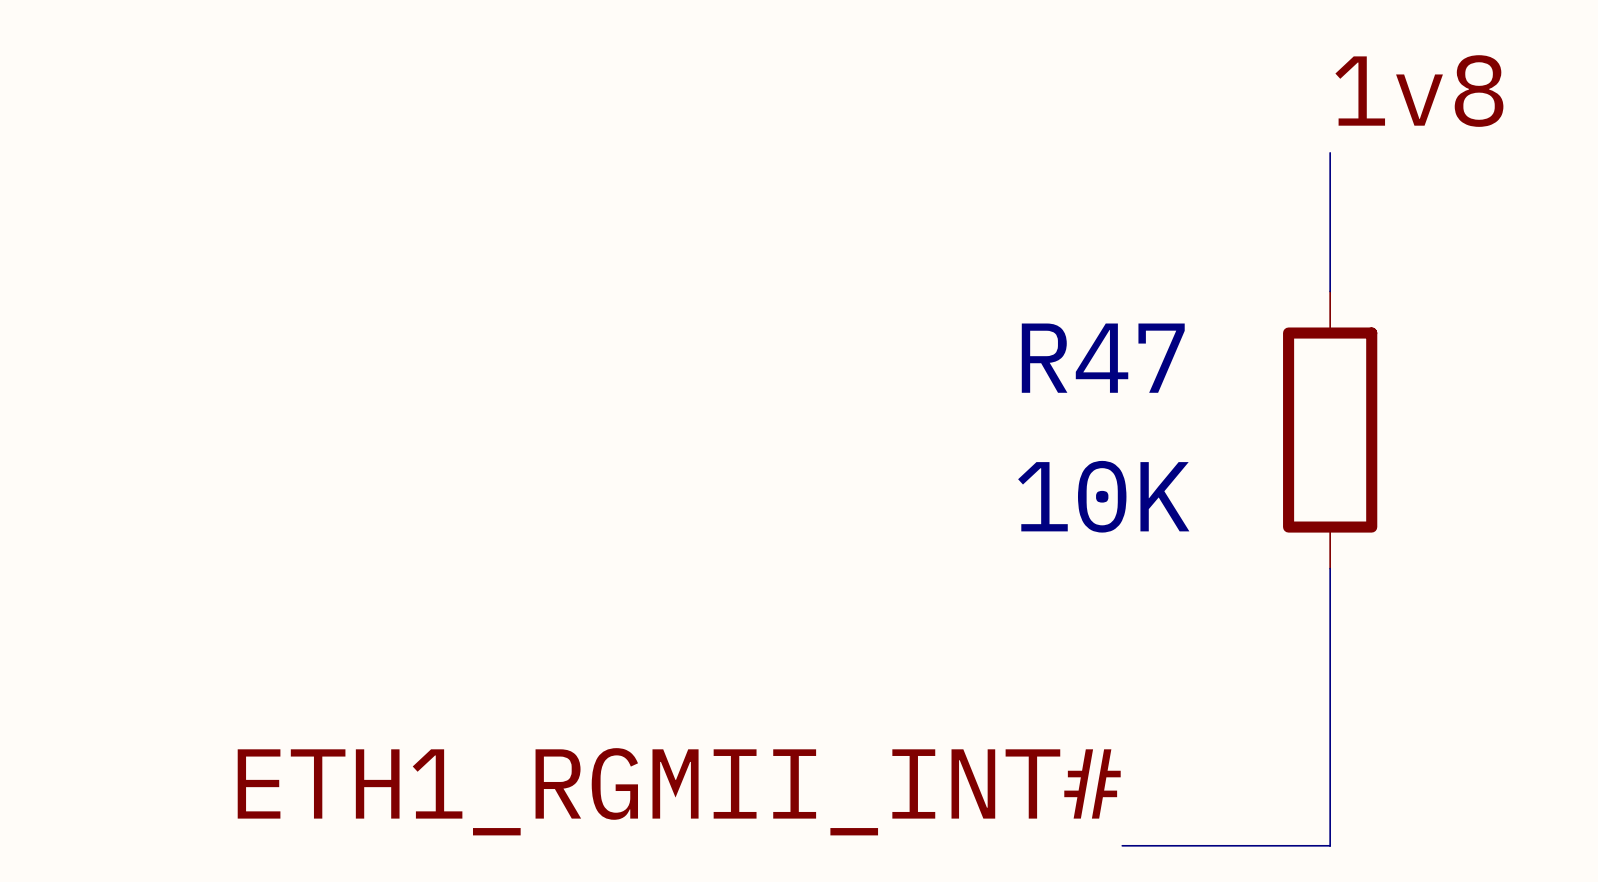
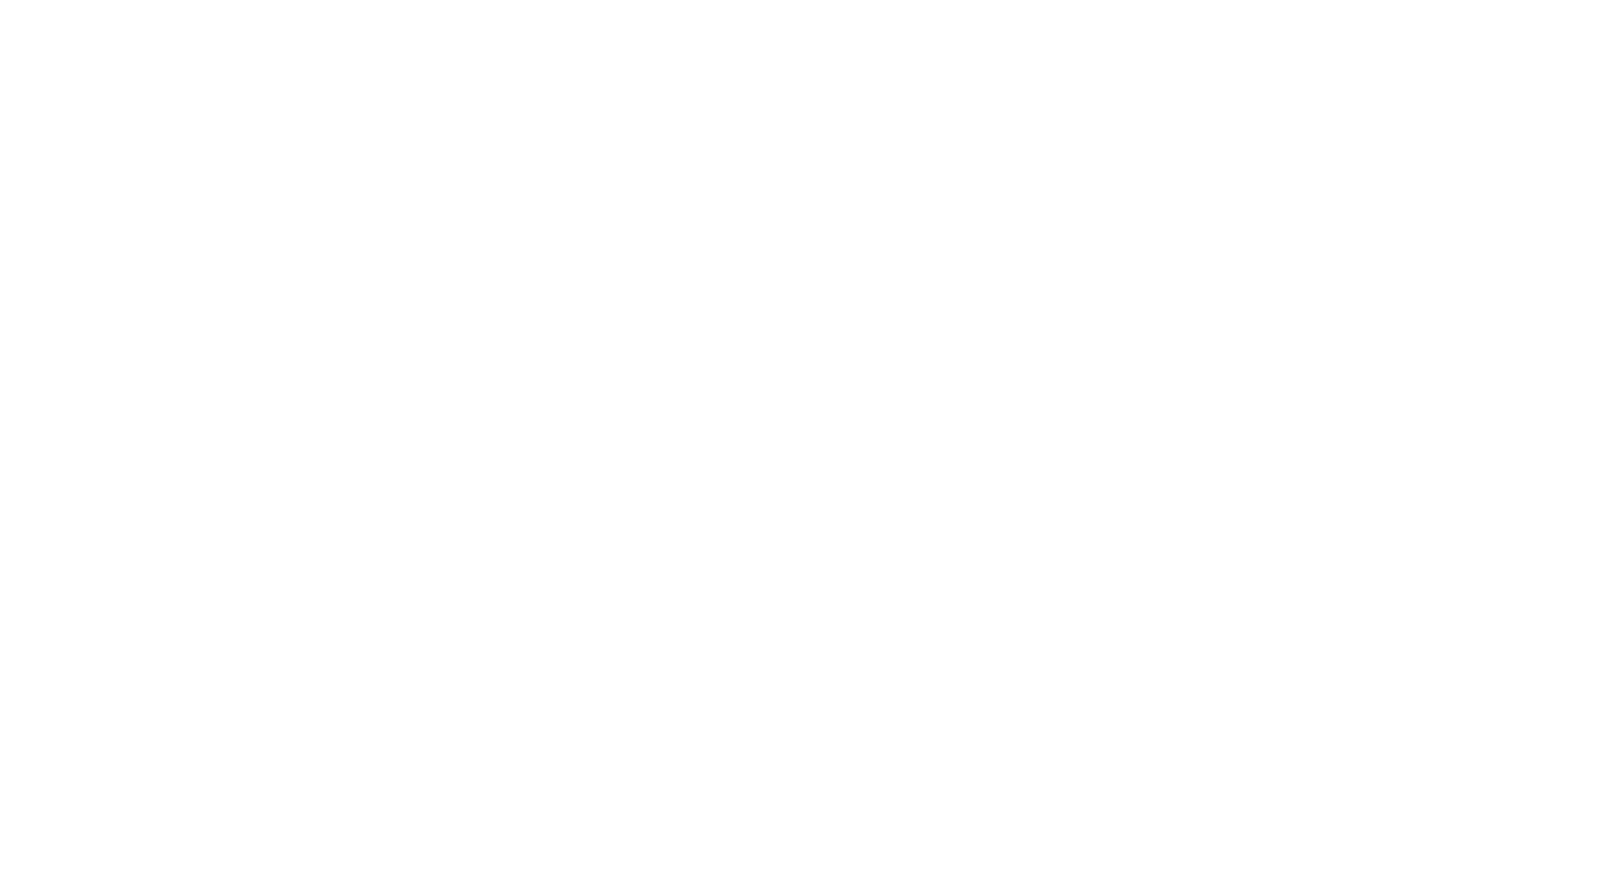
label: 1v8 (1419, 91) -> none
wire: (1330, 152) (1330, 291) -> none
R47: 10K (1330, 430) -> none
wire: (1330, 568) (1330, 845) (1122, 845) -> none
label: ETH1_RGMII_INT# (679, 791) -> none

